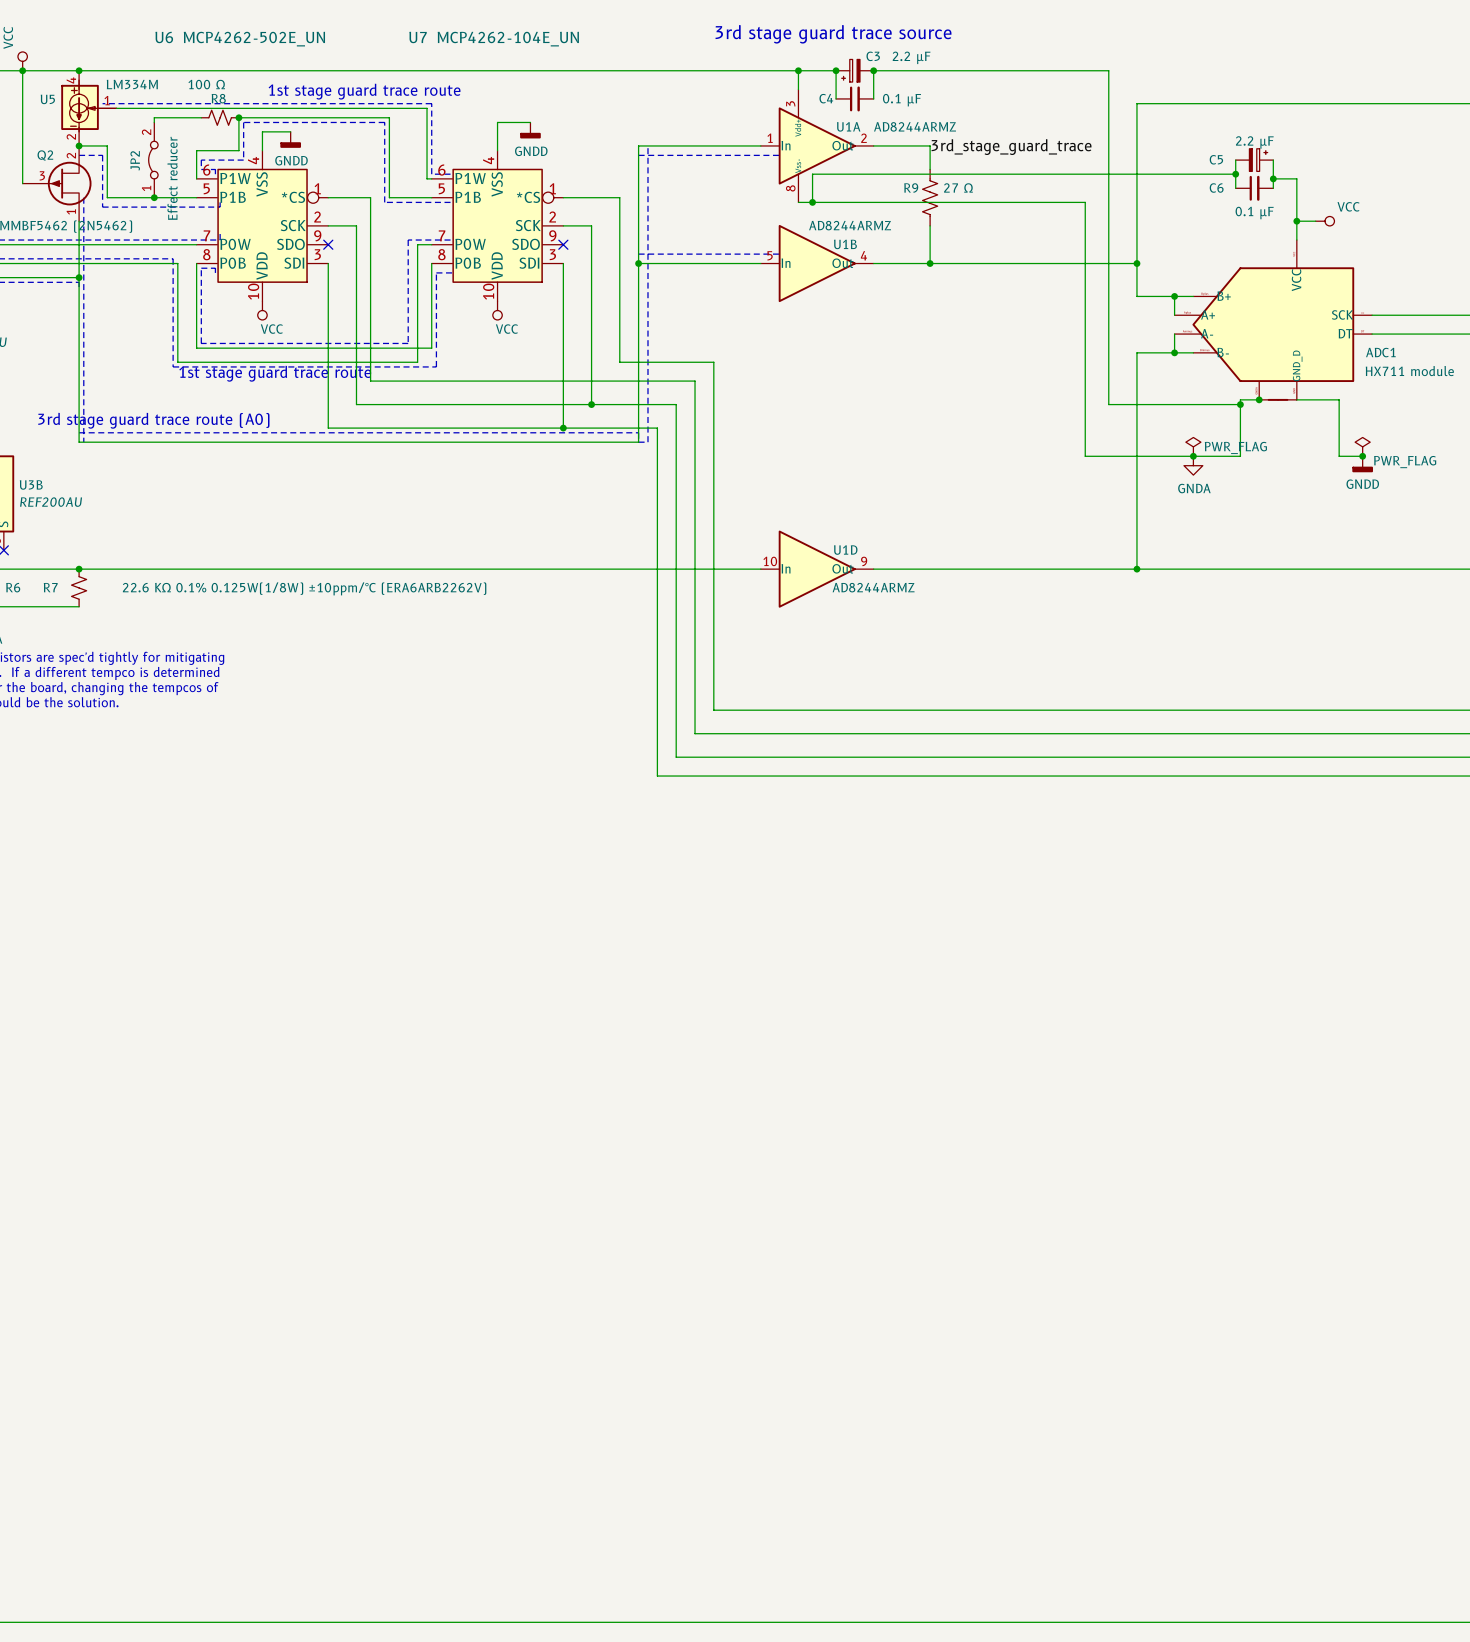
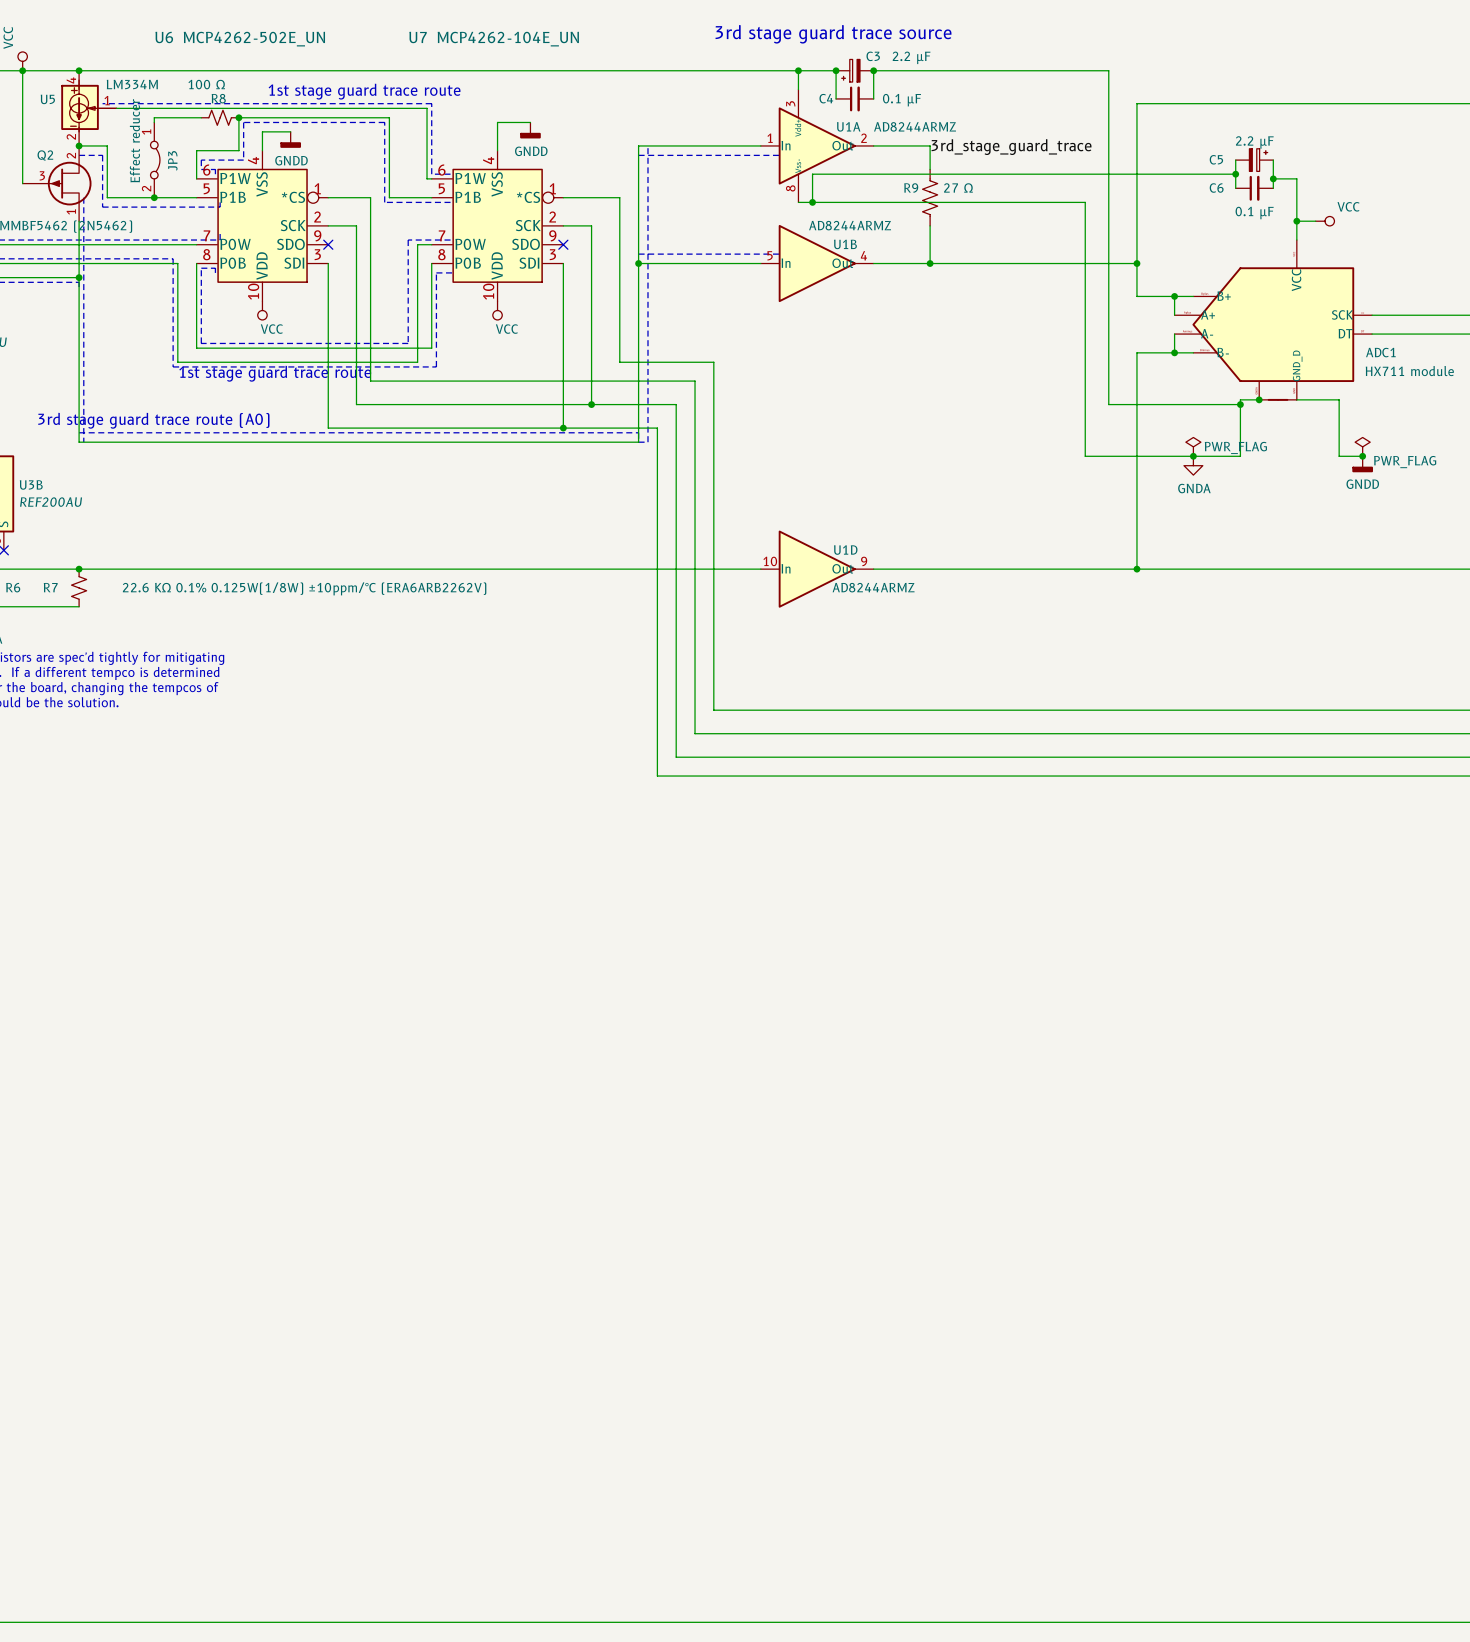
JP2: Effect reducer (153, 160) -> none
JP3: none -> Effect reducer (155, 160)

